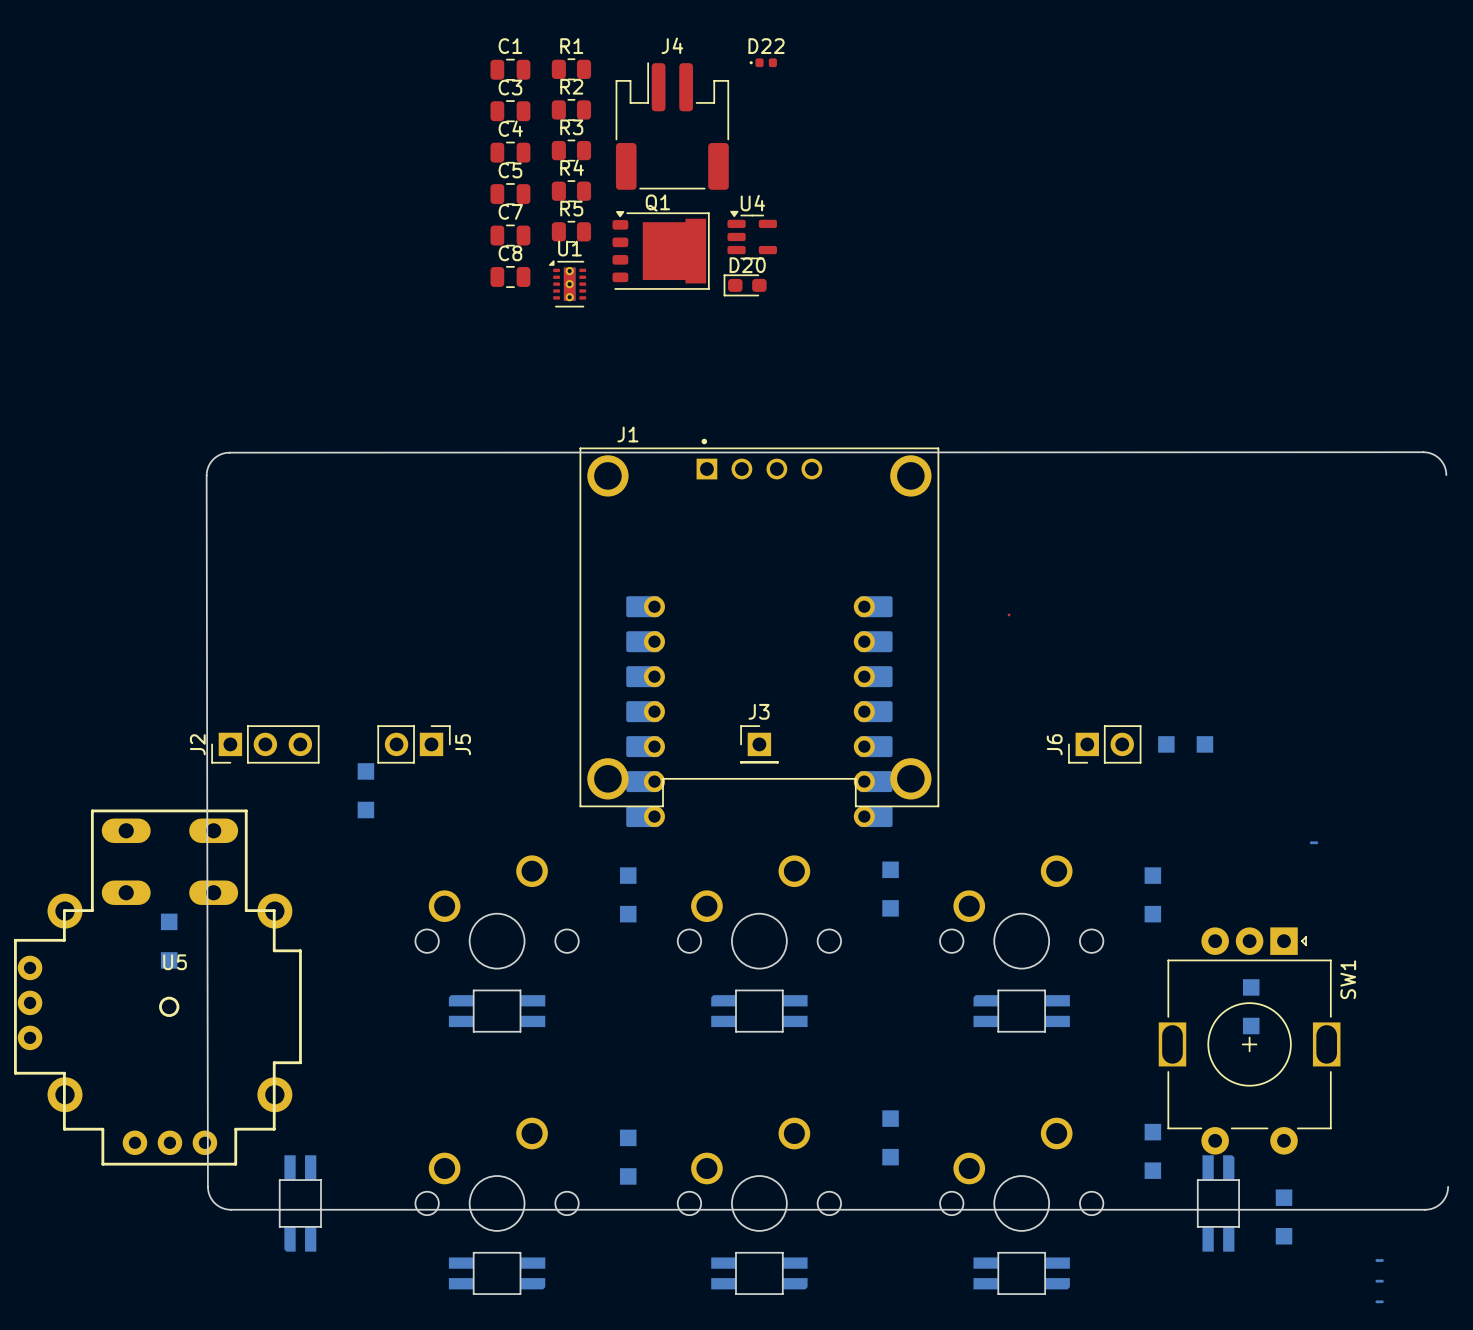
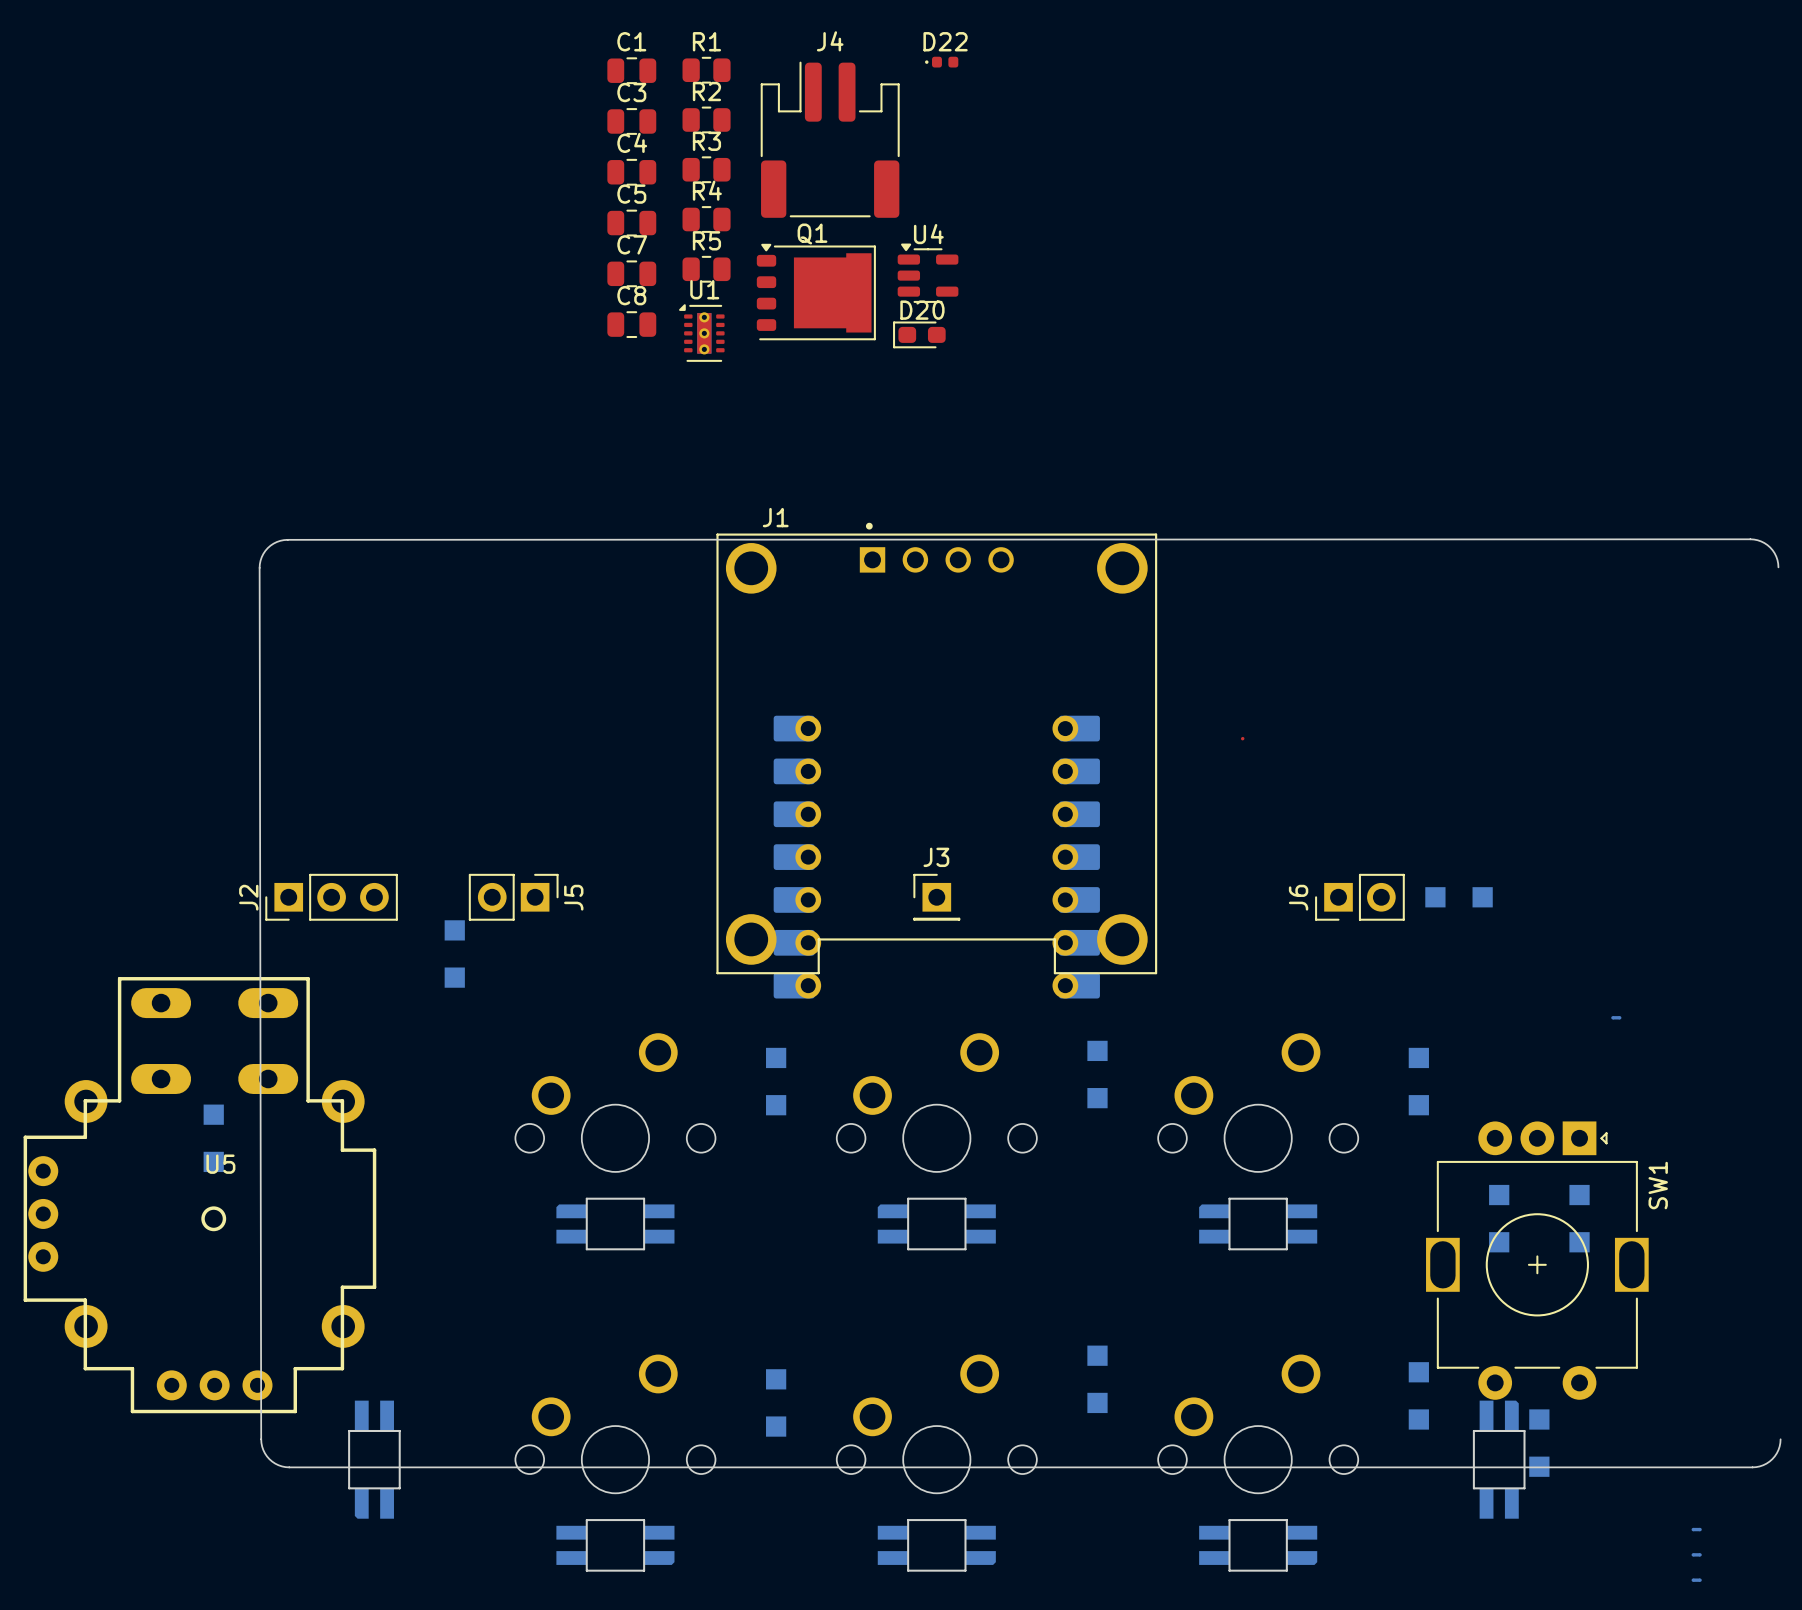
part: none -> (1499, 1218)
part: (1251, 1006) -> none
part: none -> (1579, 1218)
part position: (1284, 1216) -> (1539, 1443)

